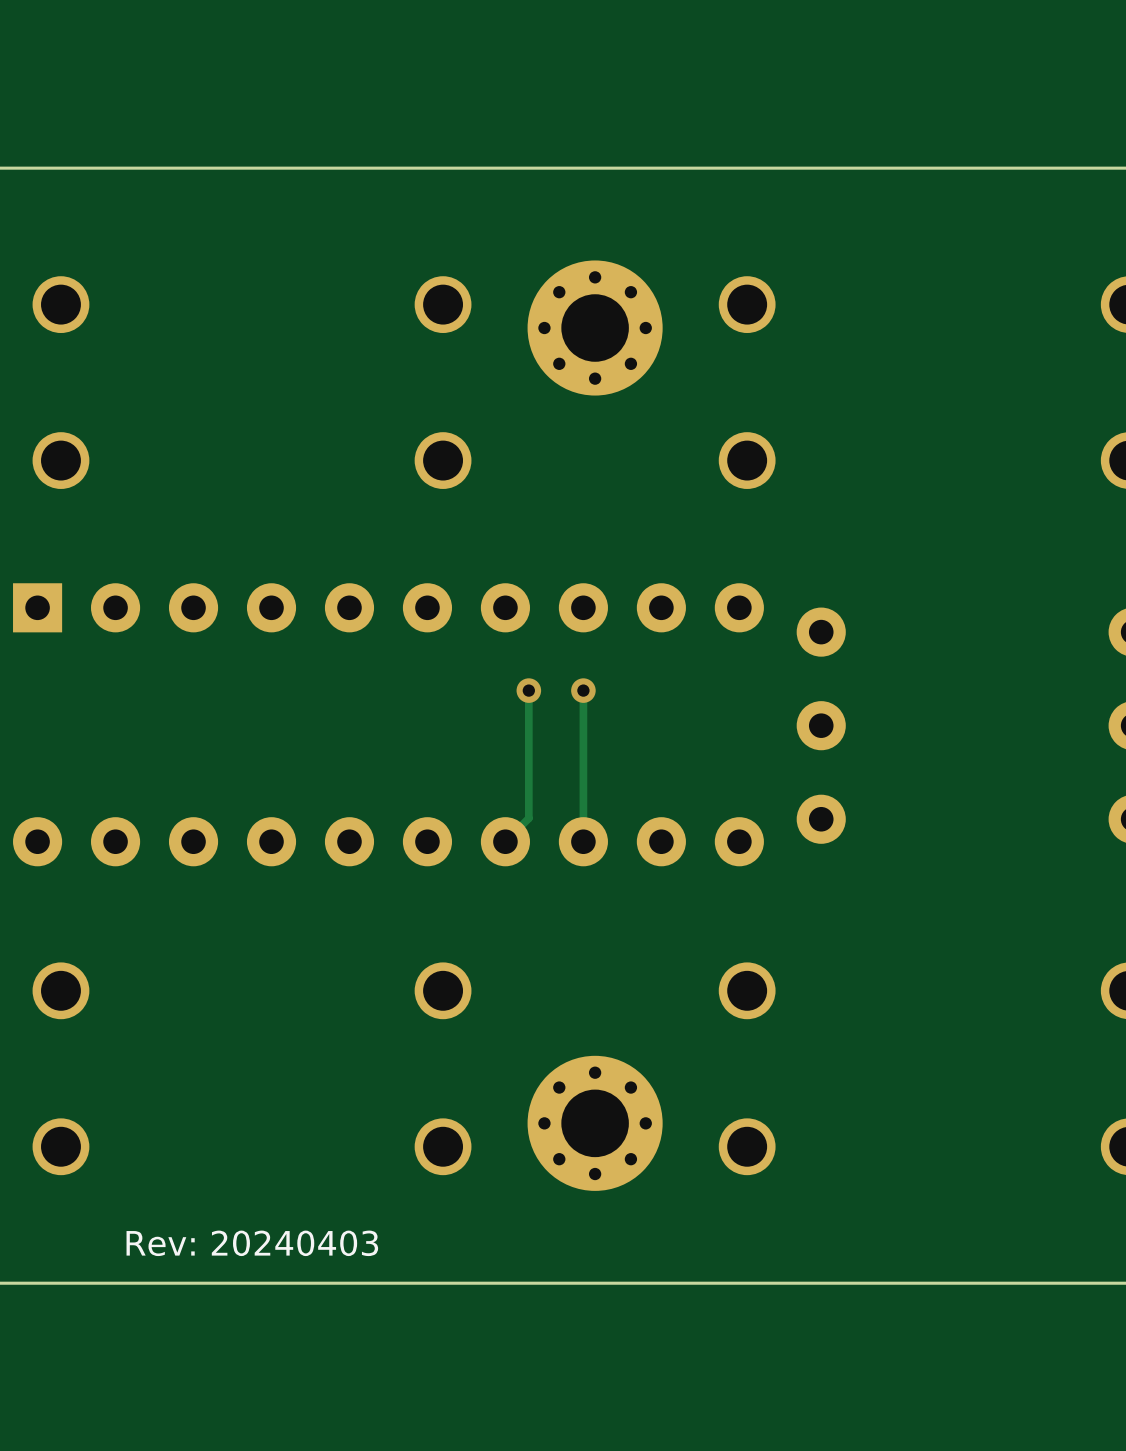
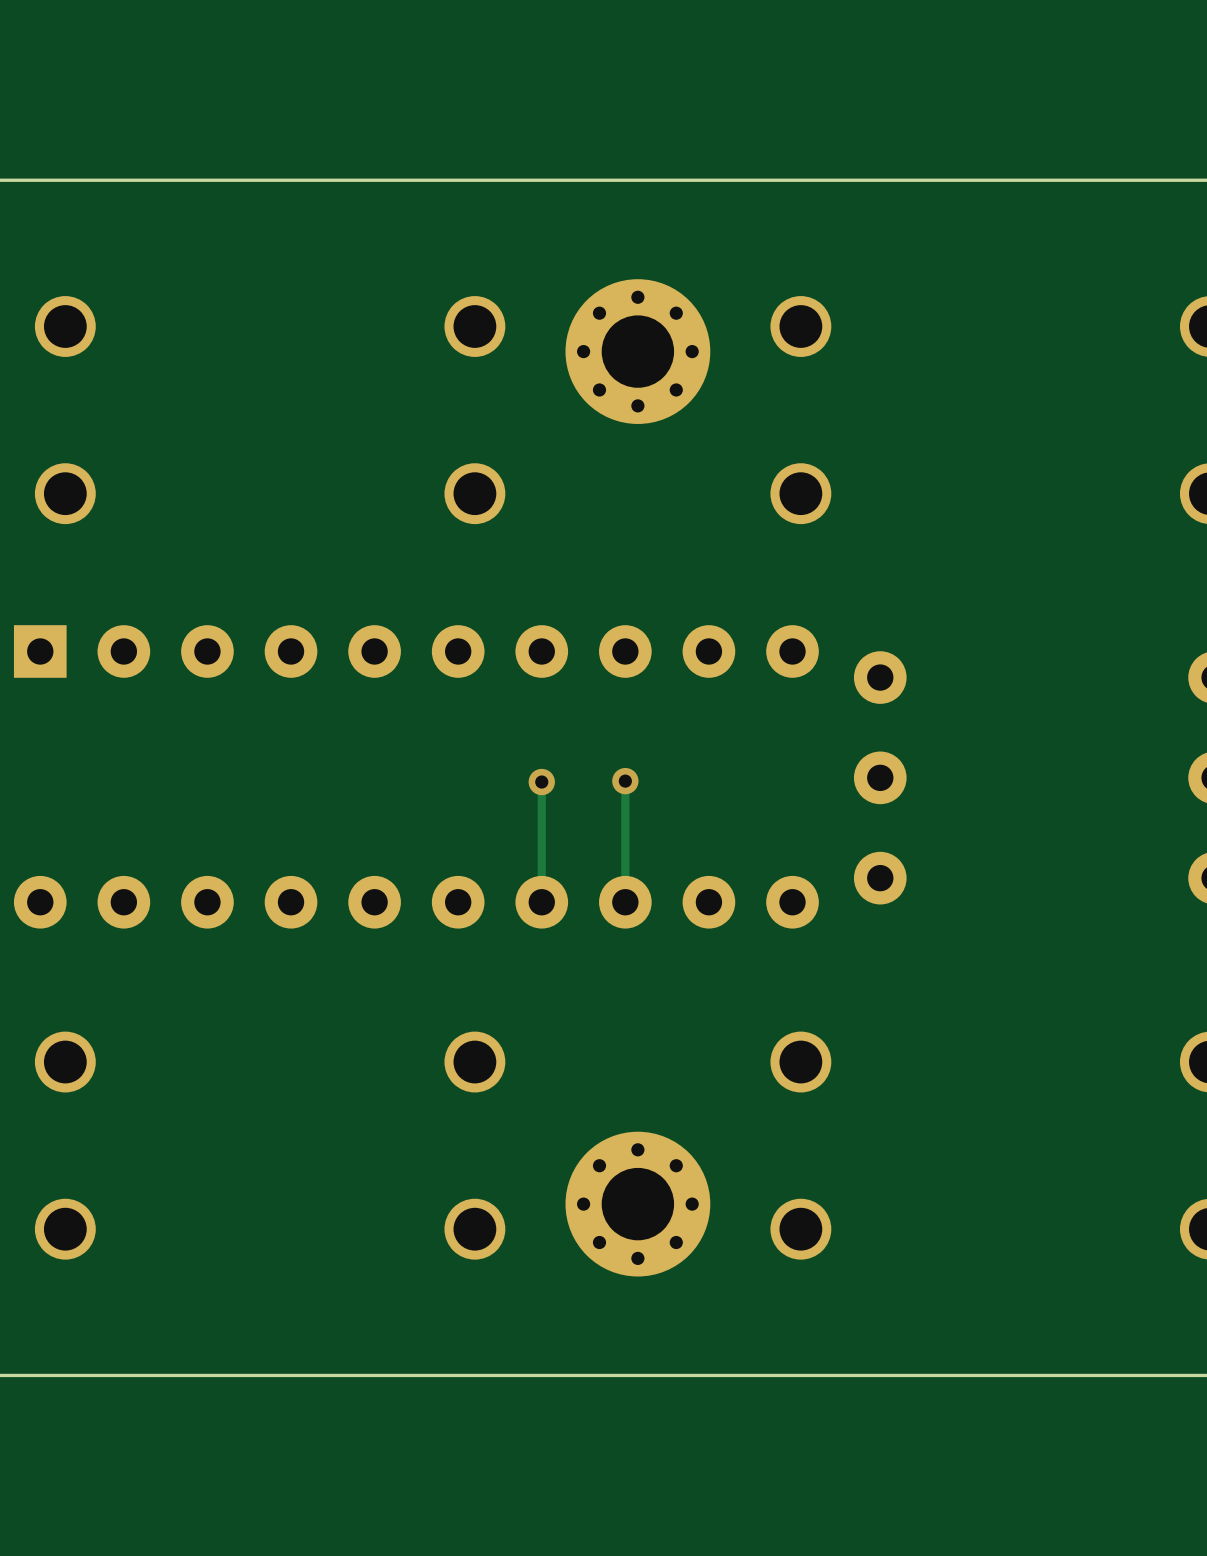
track: (528, 690) (528, 818) (505, 841) -> (541, 782) (541, 902)
via: (528, 690) -> none
track: (583, 690) (583, 728) -> none
via: (583, 690) -> none
via: none -> (625, 781)
via: none -> (541, 782)
text: Rev: 20240403 (252, 1243) -> none

